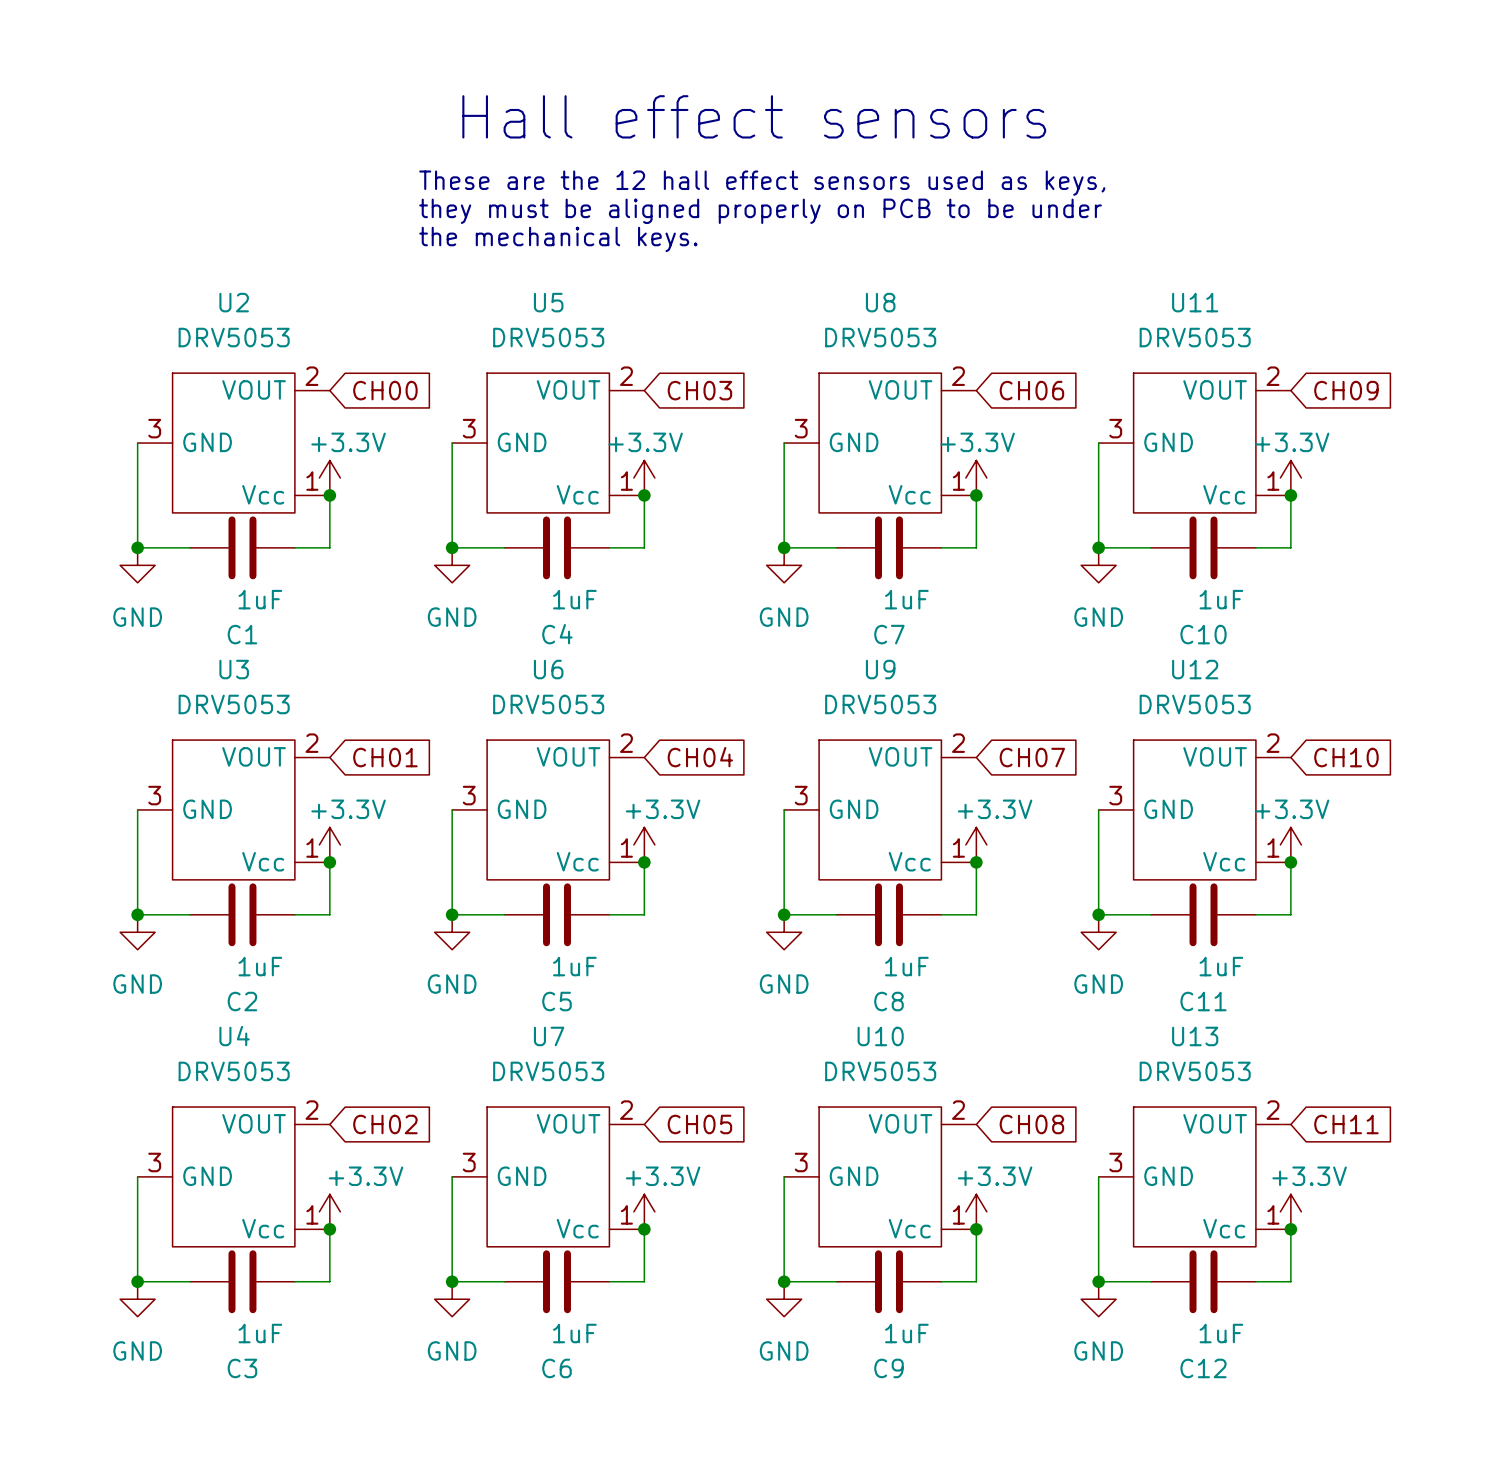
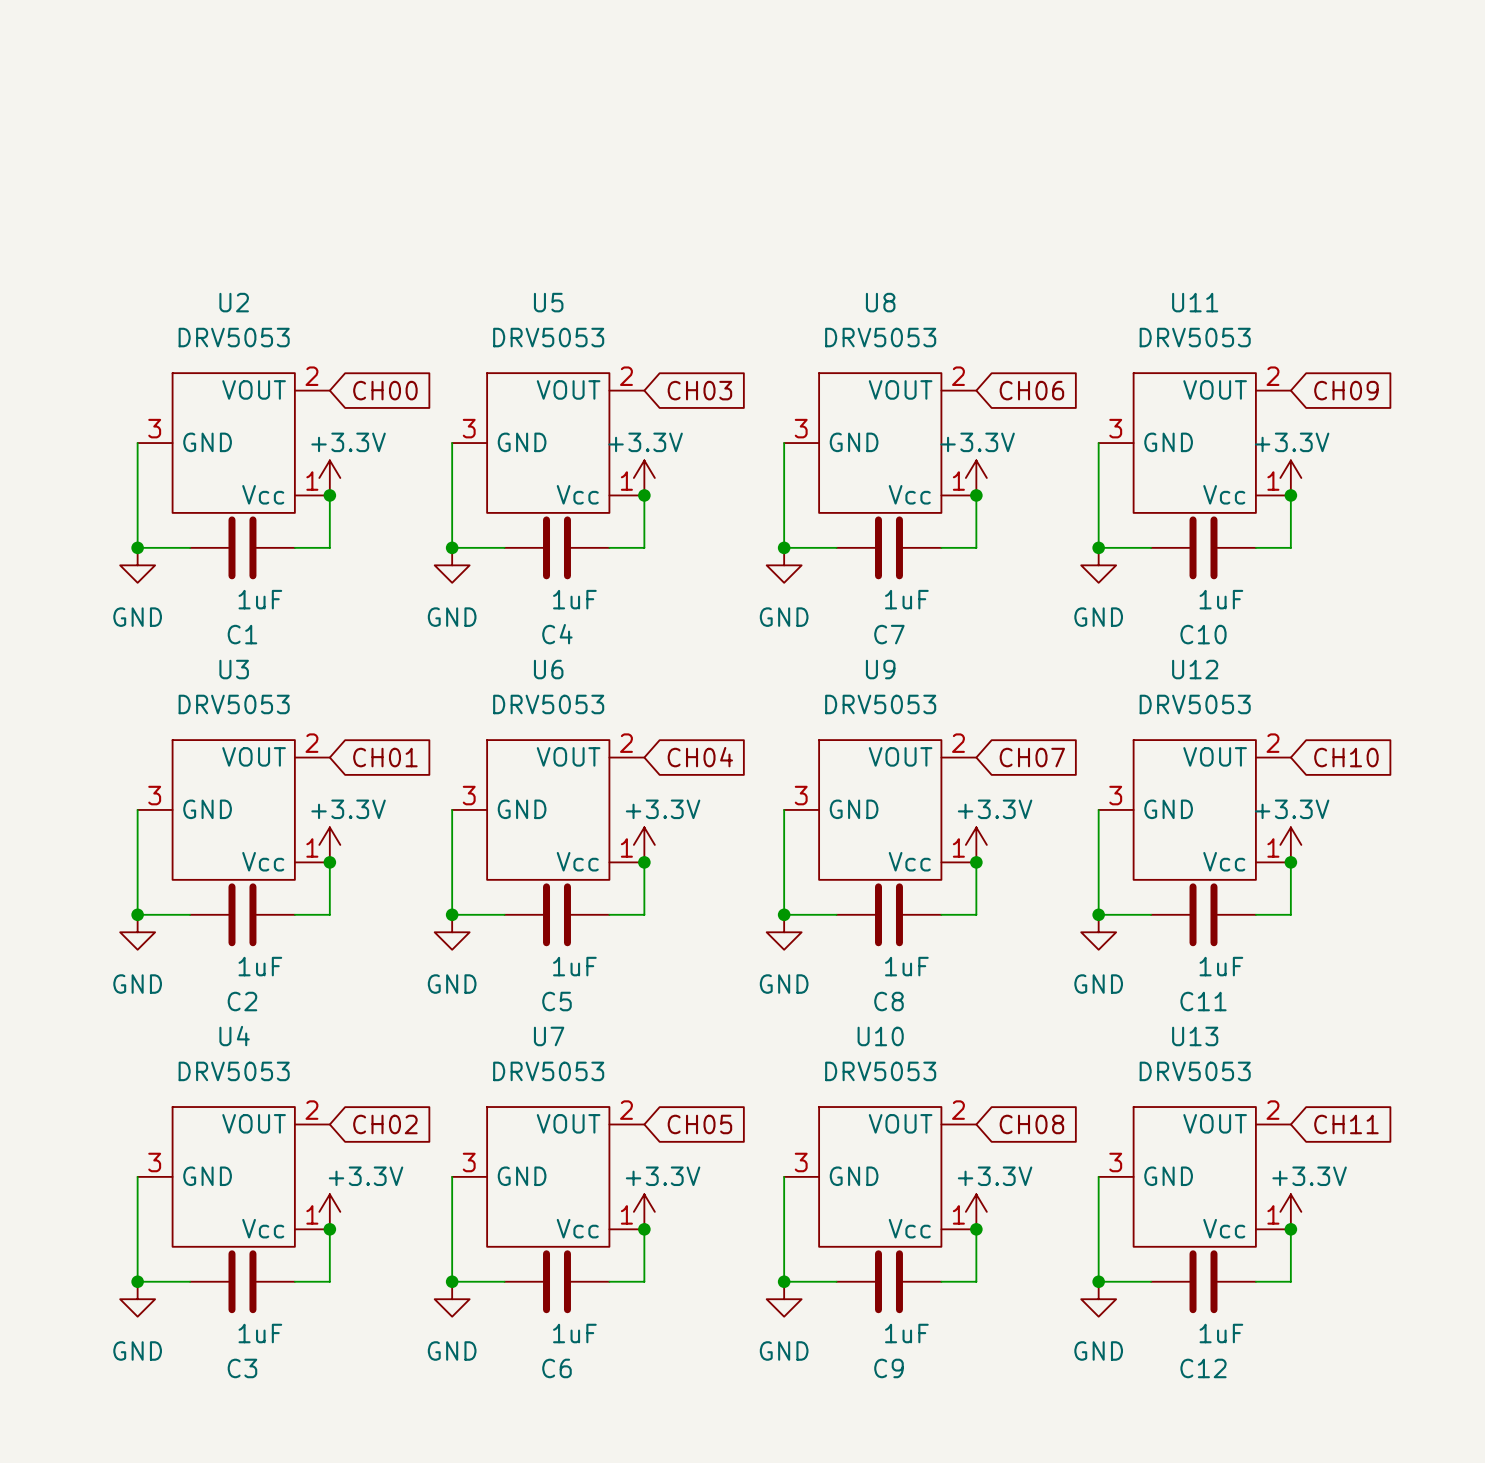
text: Hall effect sensors (754, 116) -> none
text: These are the 12 hall effect sensors used as keys, (762, 183) -> none
text: they must be aligned properly on PCB to be under (760, 211) -> none
text: the mechanical keys. (558, 239) -> none

